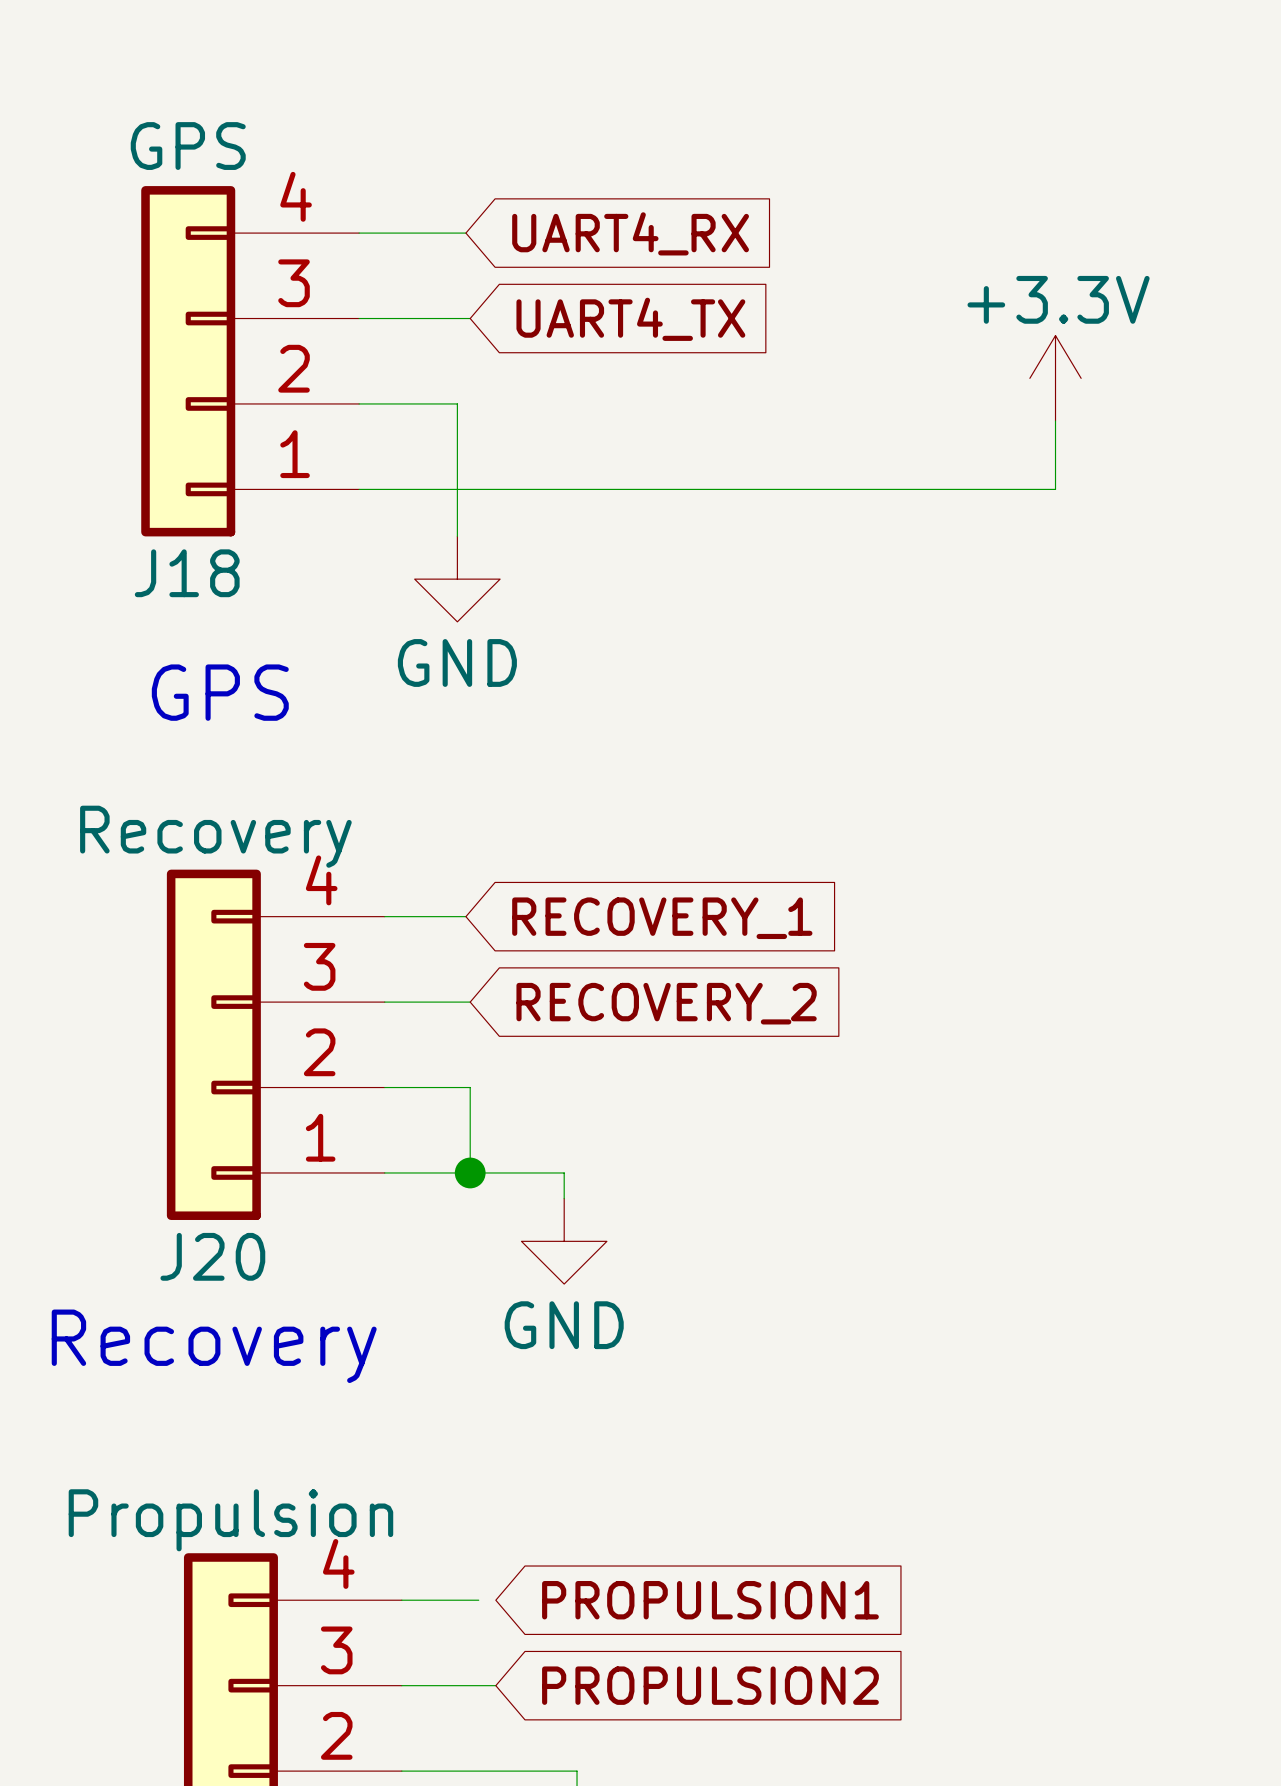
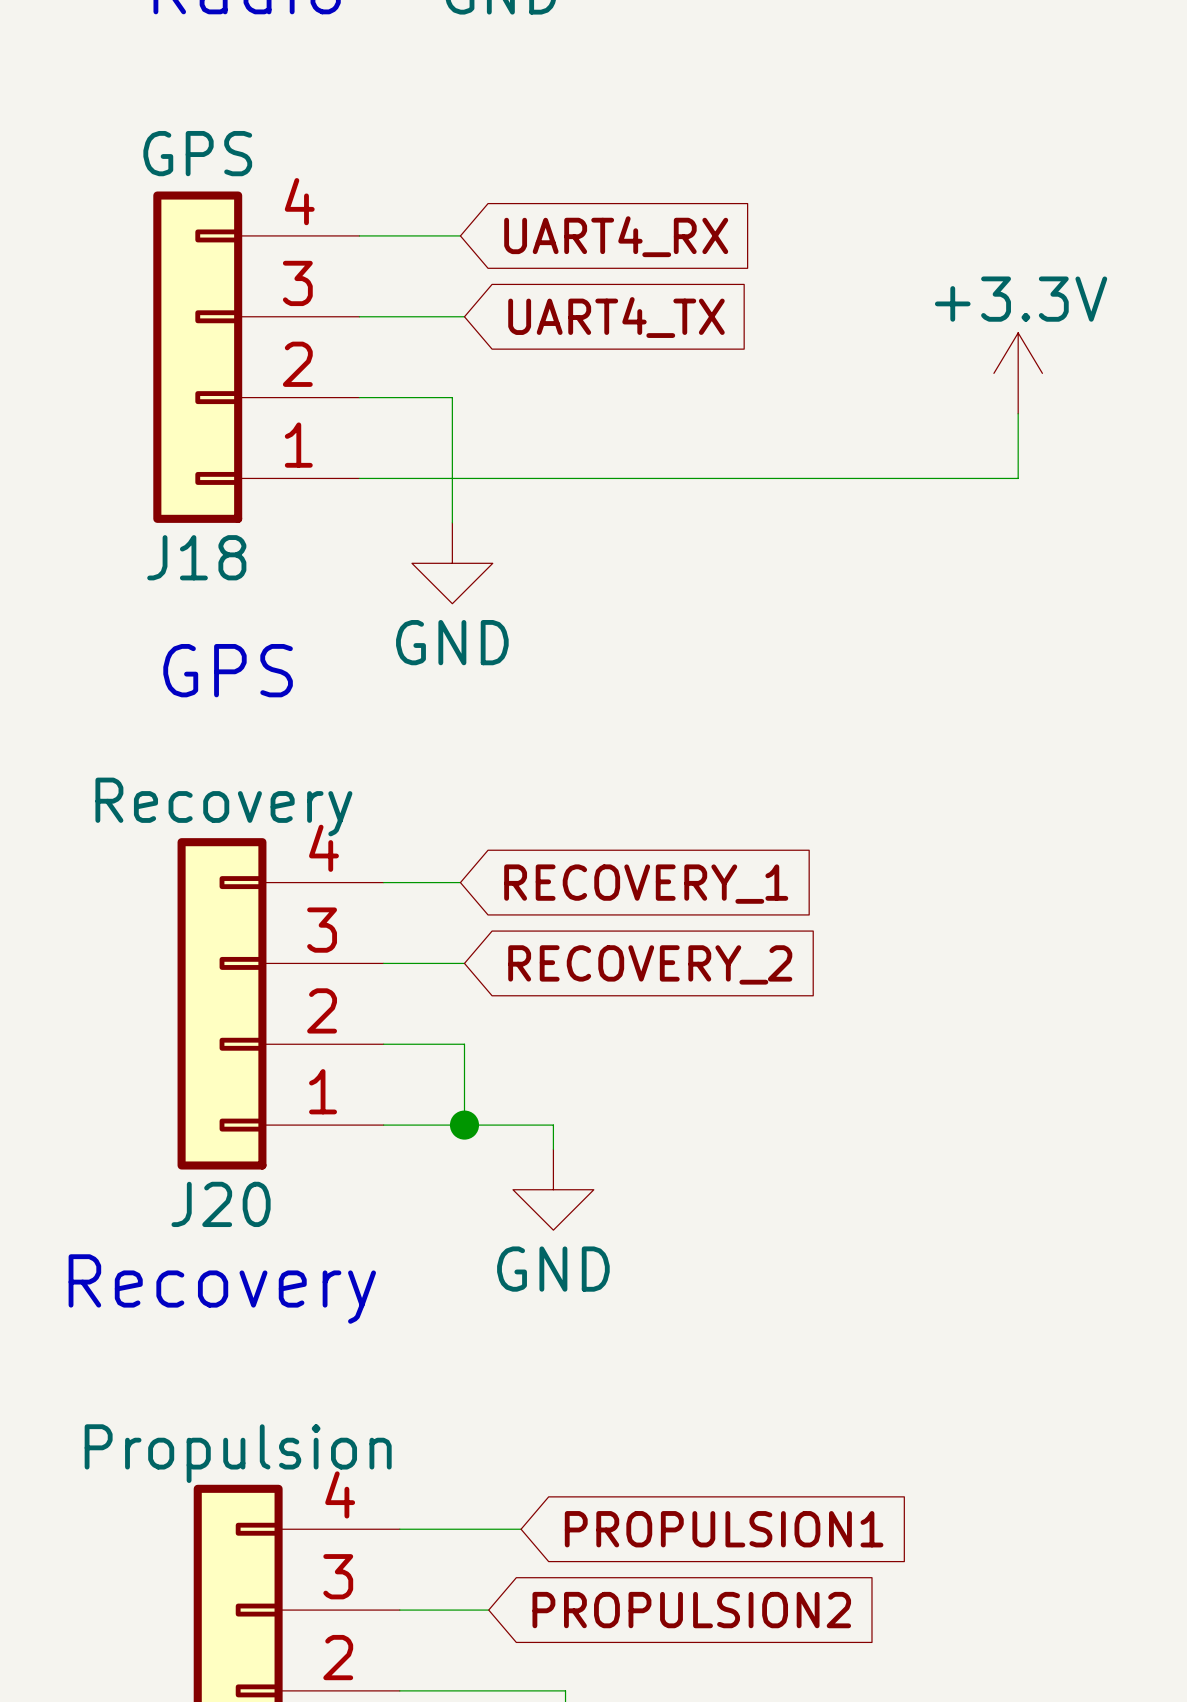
wire: none -> (472, 1529) (521, 1529)
global label position: PROPULSION1 (710, 1600) -> PROPULSION1 (724, 1529)

